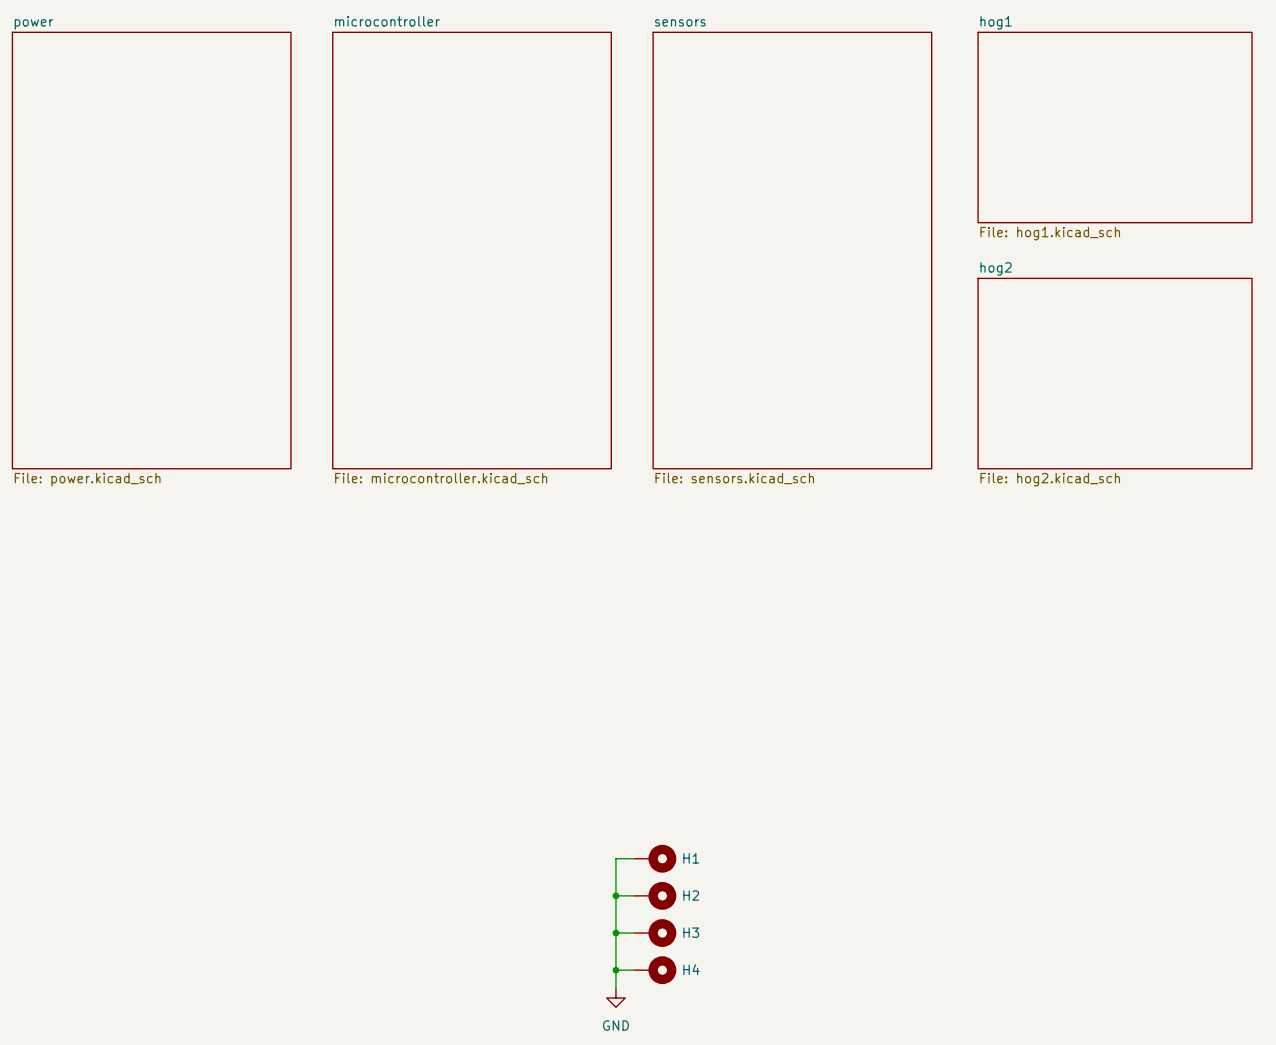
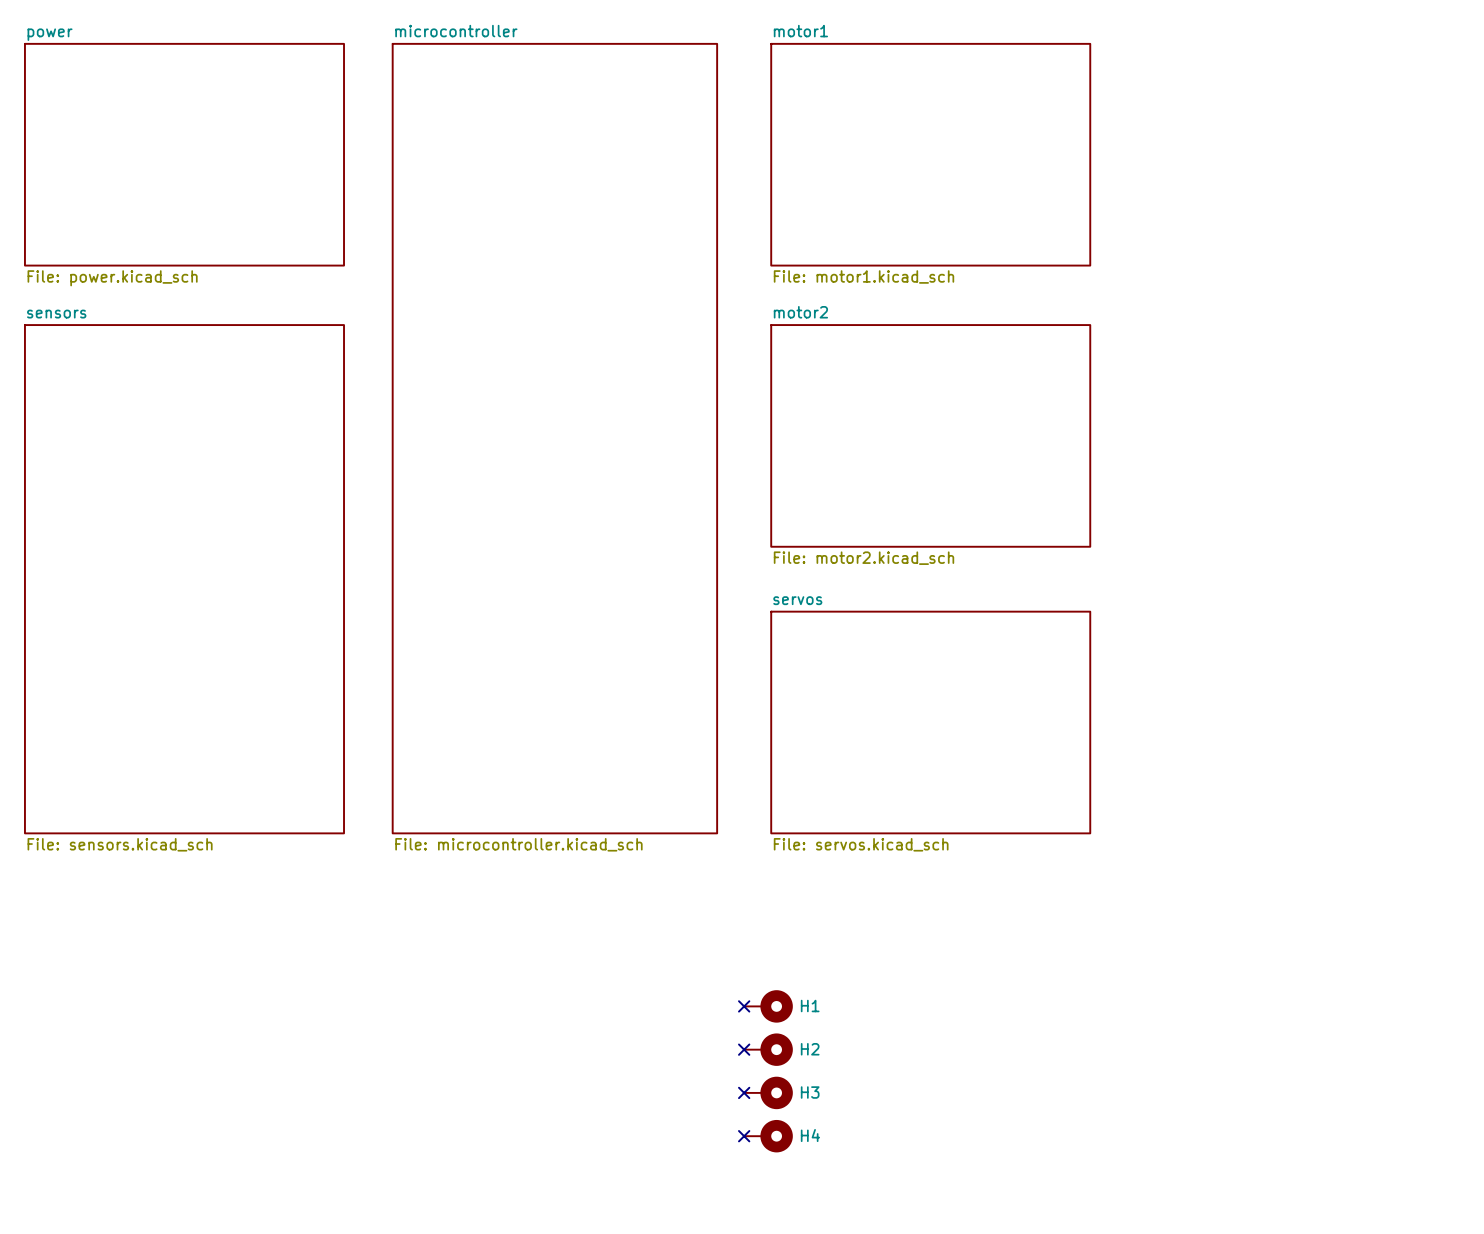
sheet power: none -> File: power.kicad_sch (184, 154)
sheet motor1: none -> File: motor1.kicad_sch (930, 154)
sheet hog1: File: hog1.kicad_sch (1115, 127) -> none
sheet power: File: power.kicad_sch (151, 250) -> none
sheet microcontroller: File: microcontroller.kicad_sch (472, 250) -> none
sheet sensors: File: sensors.kicad_sch (792, 250) -> none
sheet motor2: none -> File: motor2.kicad_sch (930, 435)
sheet microcontroller: none -> File: microcontroller.kicad_sch (554, 438)
sheet hog2: File: hog2.kicad_sch (1115, 373) -> none
sheet sensors: none -> File: sensors.kicad_sch (184, 579)
sheet servos: none -> File: servos.kicad_sch (930, 722)
wire: (634, 858) (615, 858) (615, 988) -> none
no-connect mark: none -> (744, 1006)
wire: (615, 895) (634, 895) -> none
junction: (615, 895) -> none
no-connect mark: none -> (744, 1049)
wire: (615, 933) (634, 933) -> none
junction: (615, 933) -> none
no-connect mark: none -> (744, 1092)
wire: (615, 970) (634, 970) -> none
junction: (615, 970) -> none
no-connect mark: none -> (744, 1136)
power symbol: GND (615, 998) -> none

